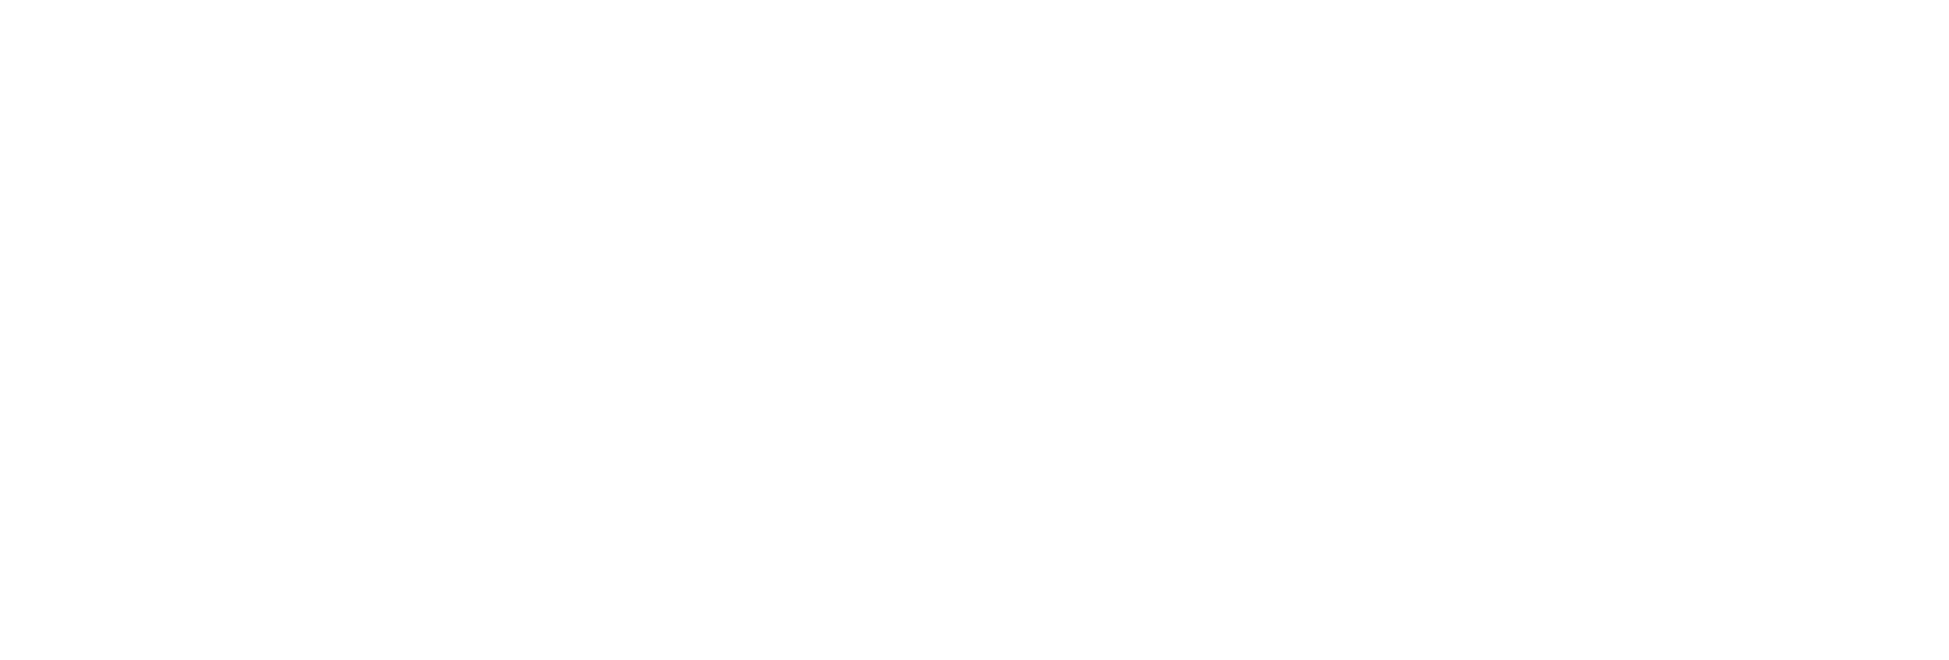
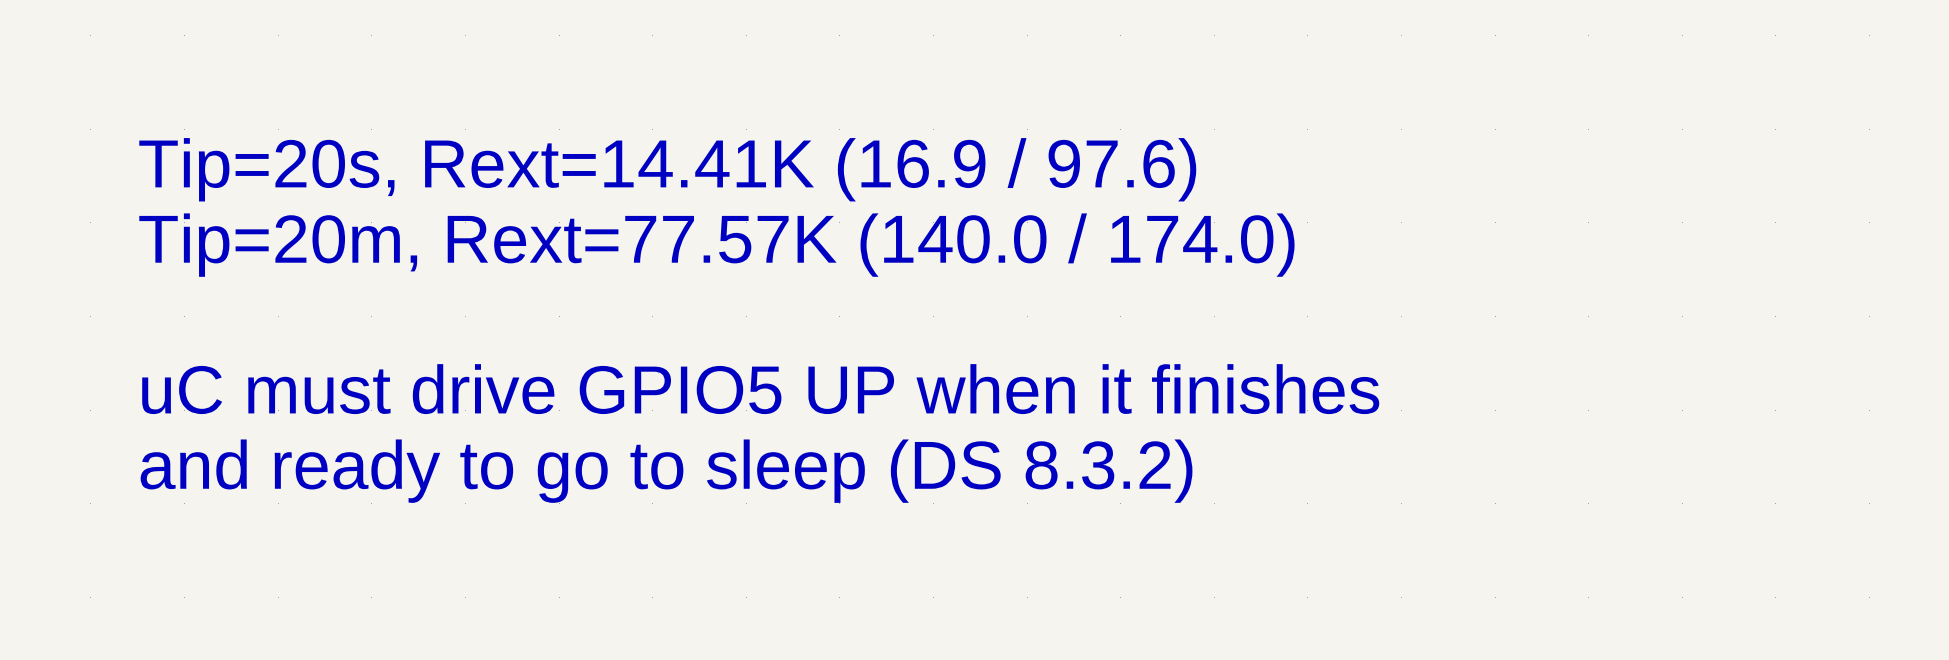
text: none -> Tip=20s, Rext=14.41K (16.9 / 97.6) (667, 169)
text: none -> Tip=20m, Rext=77.57K (140.0 / 174.0) (716, 245)
text: none -> uC must drive GPIO5 UP when it finishes (760, 389)
text: none -> and ready to go to sleep (DS 8.3.2) (666, 471)

